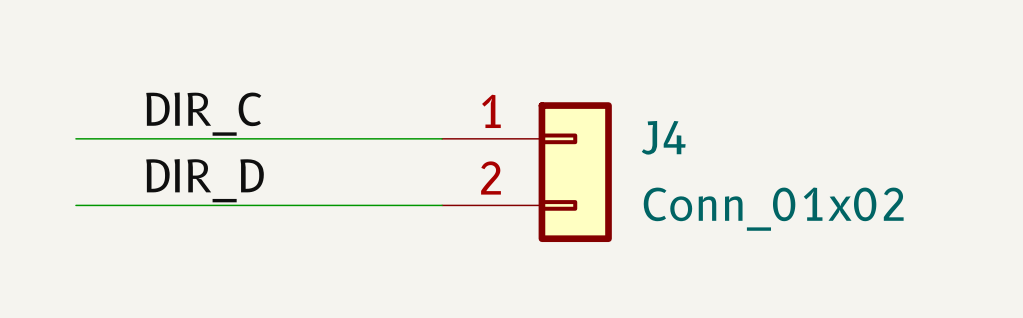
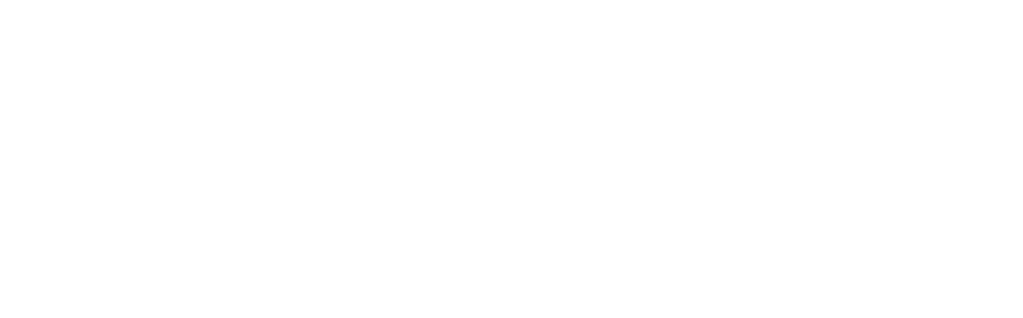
label: DIR_C (203, 114) -> none
wire: (75, 138) (442, 138) -> none
J4: Conn_01x02 (526, 172) -> none
label: DIR_D (205, 180) -> none
wire: (75, 205) (442, 205) -> none

